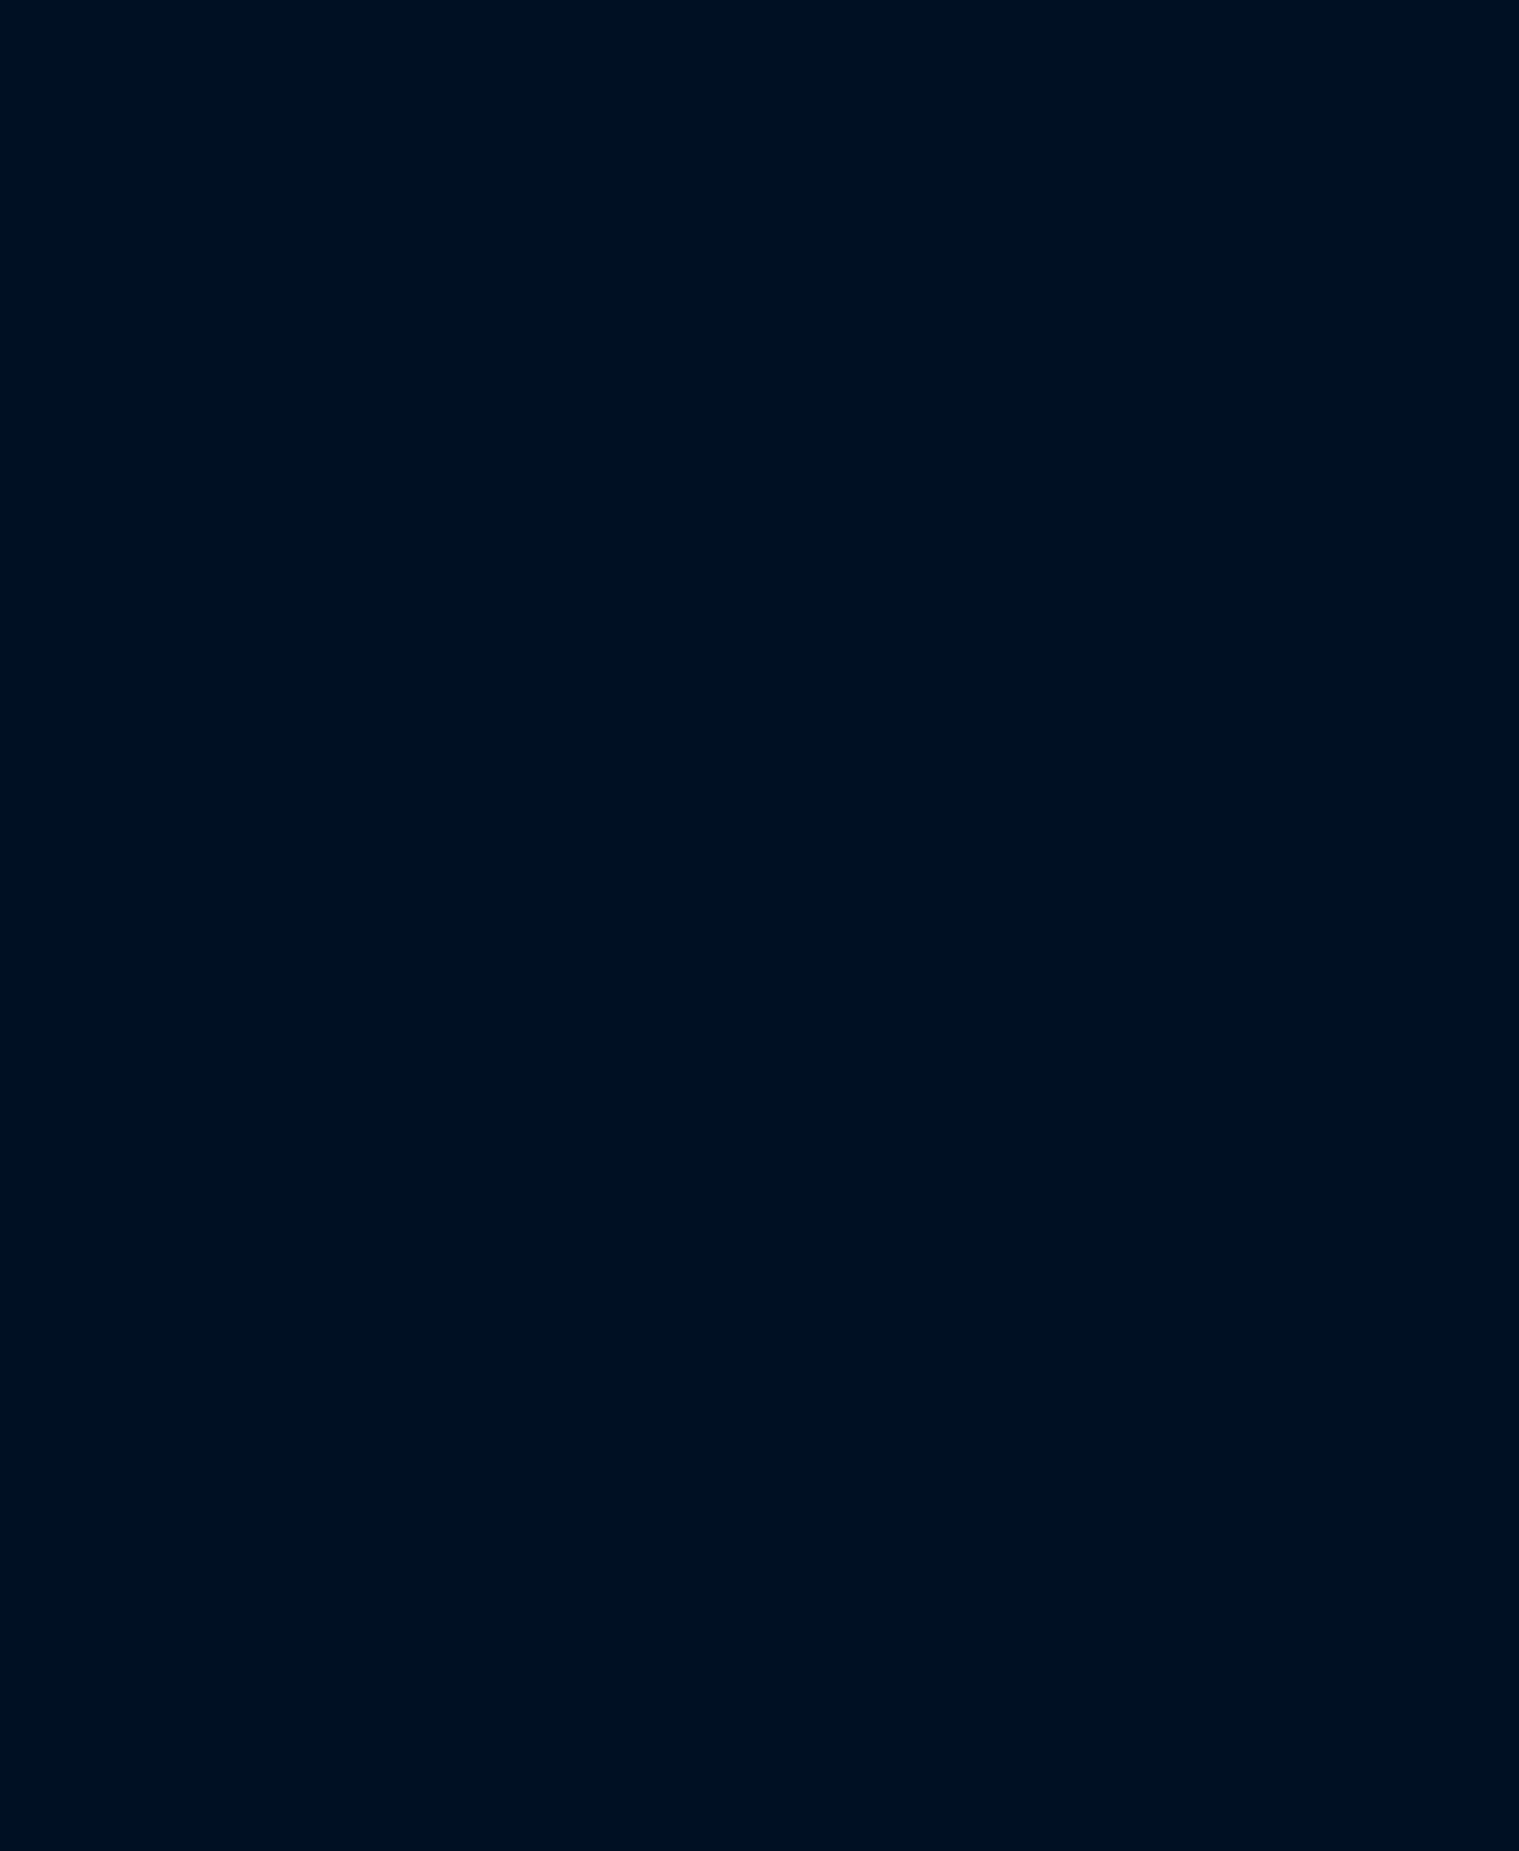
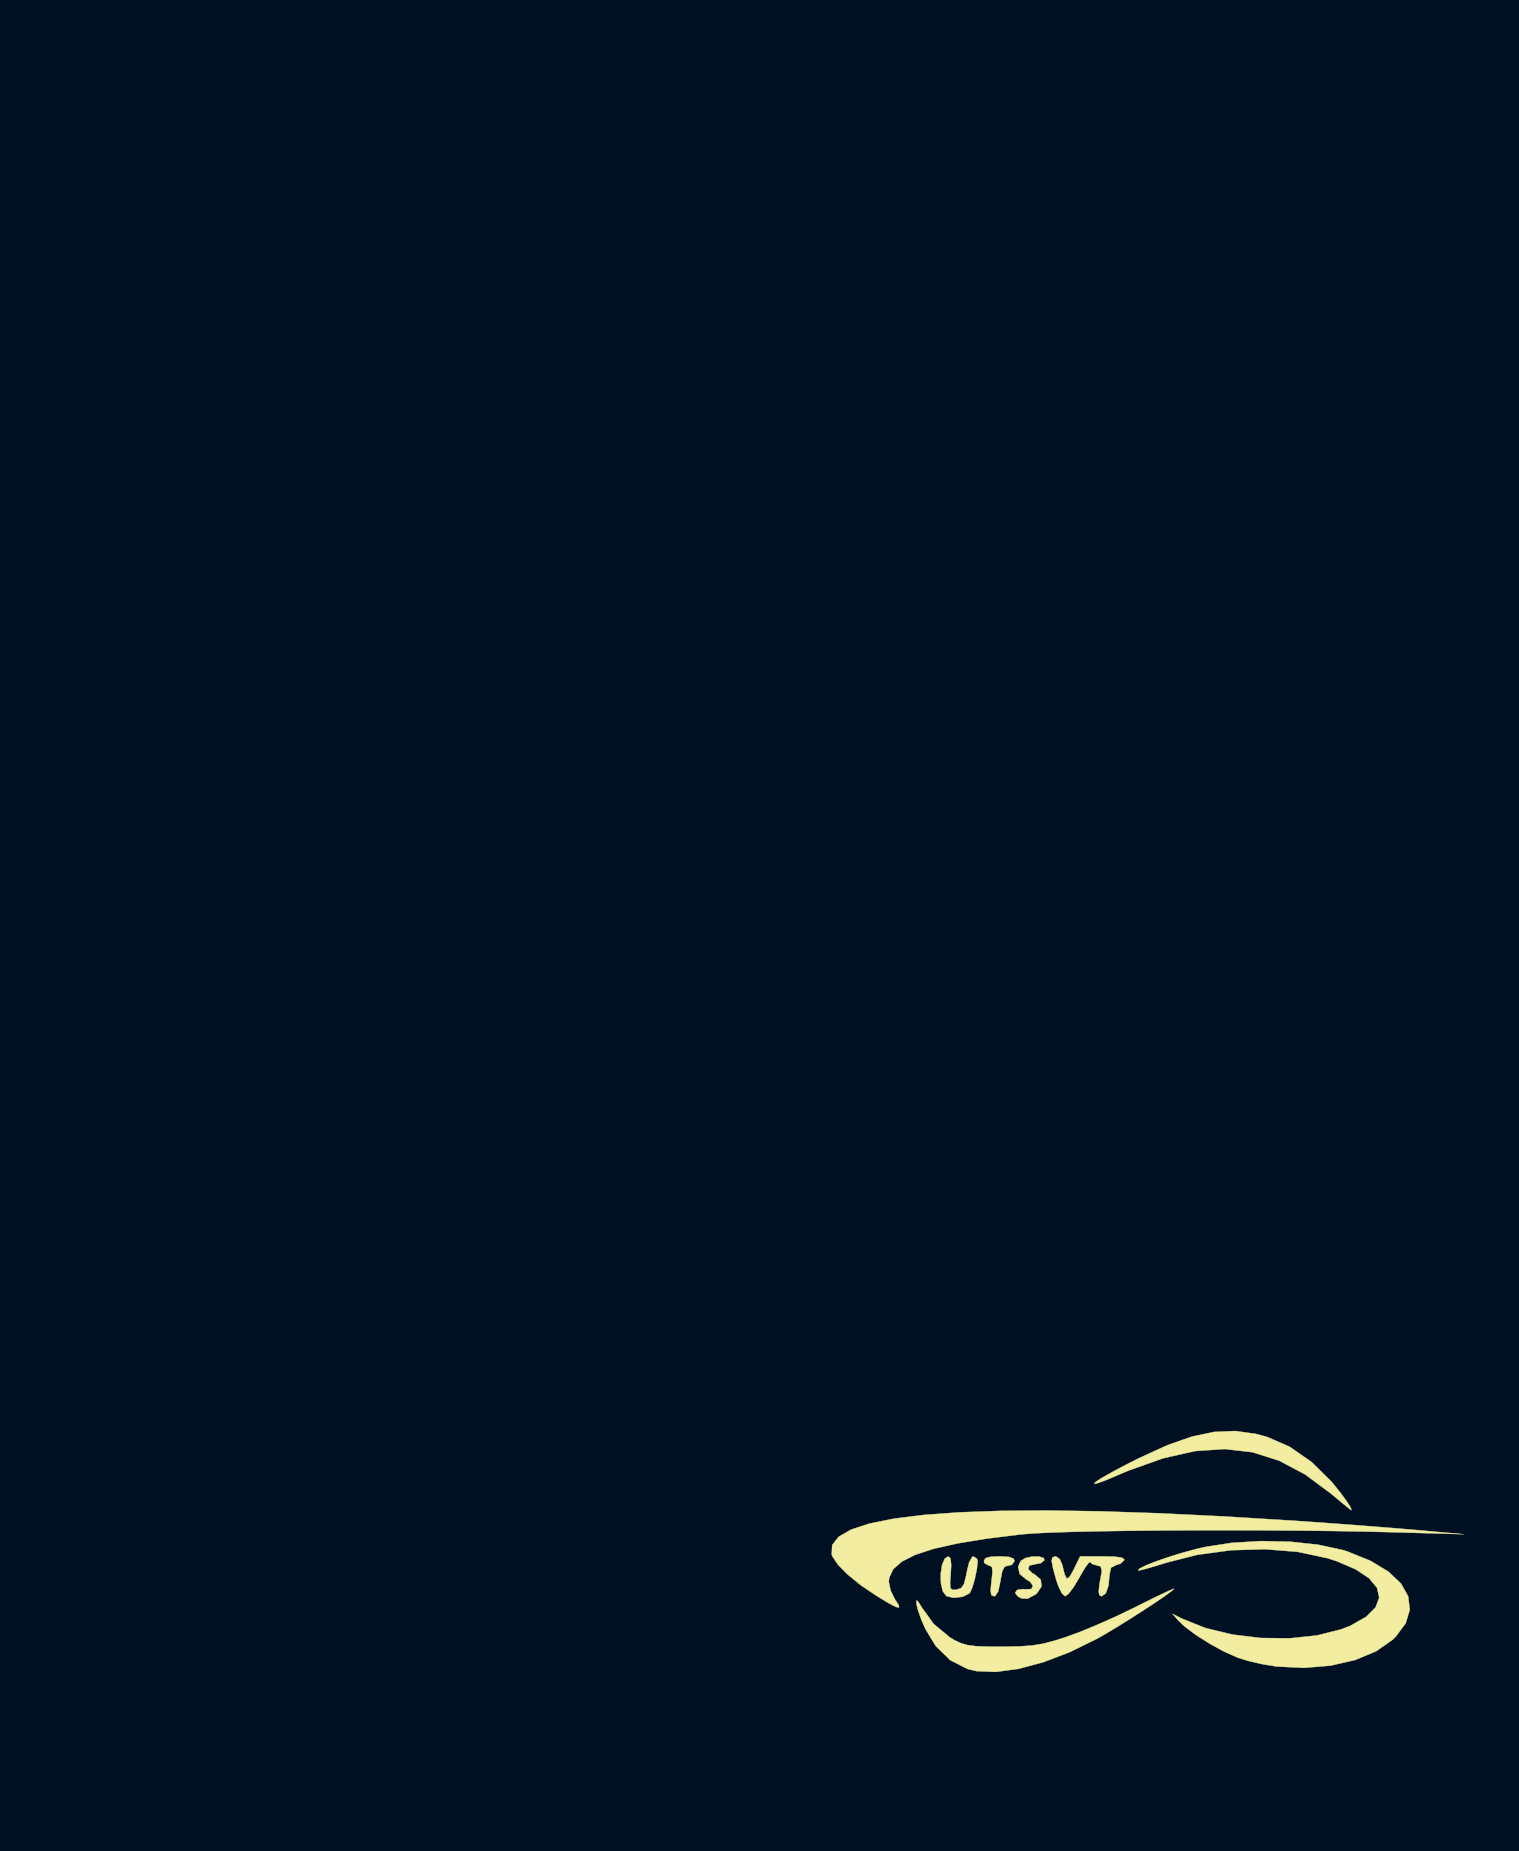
drawing: none -> [831, 1430, 1465, 1673]

